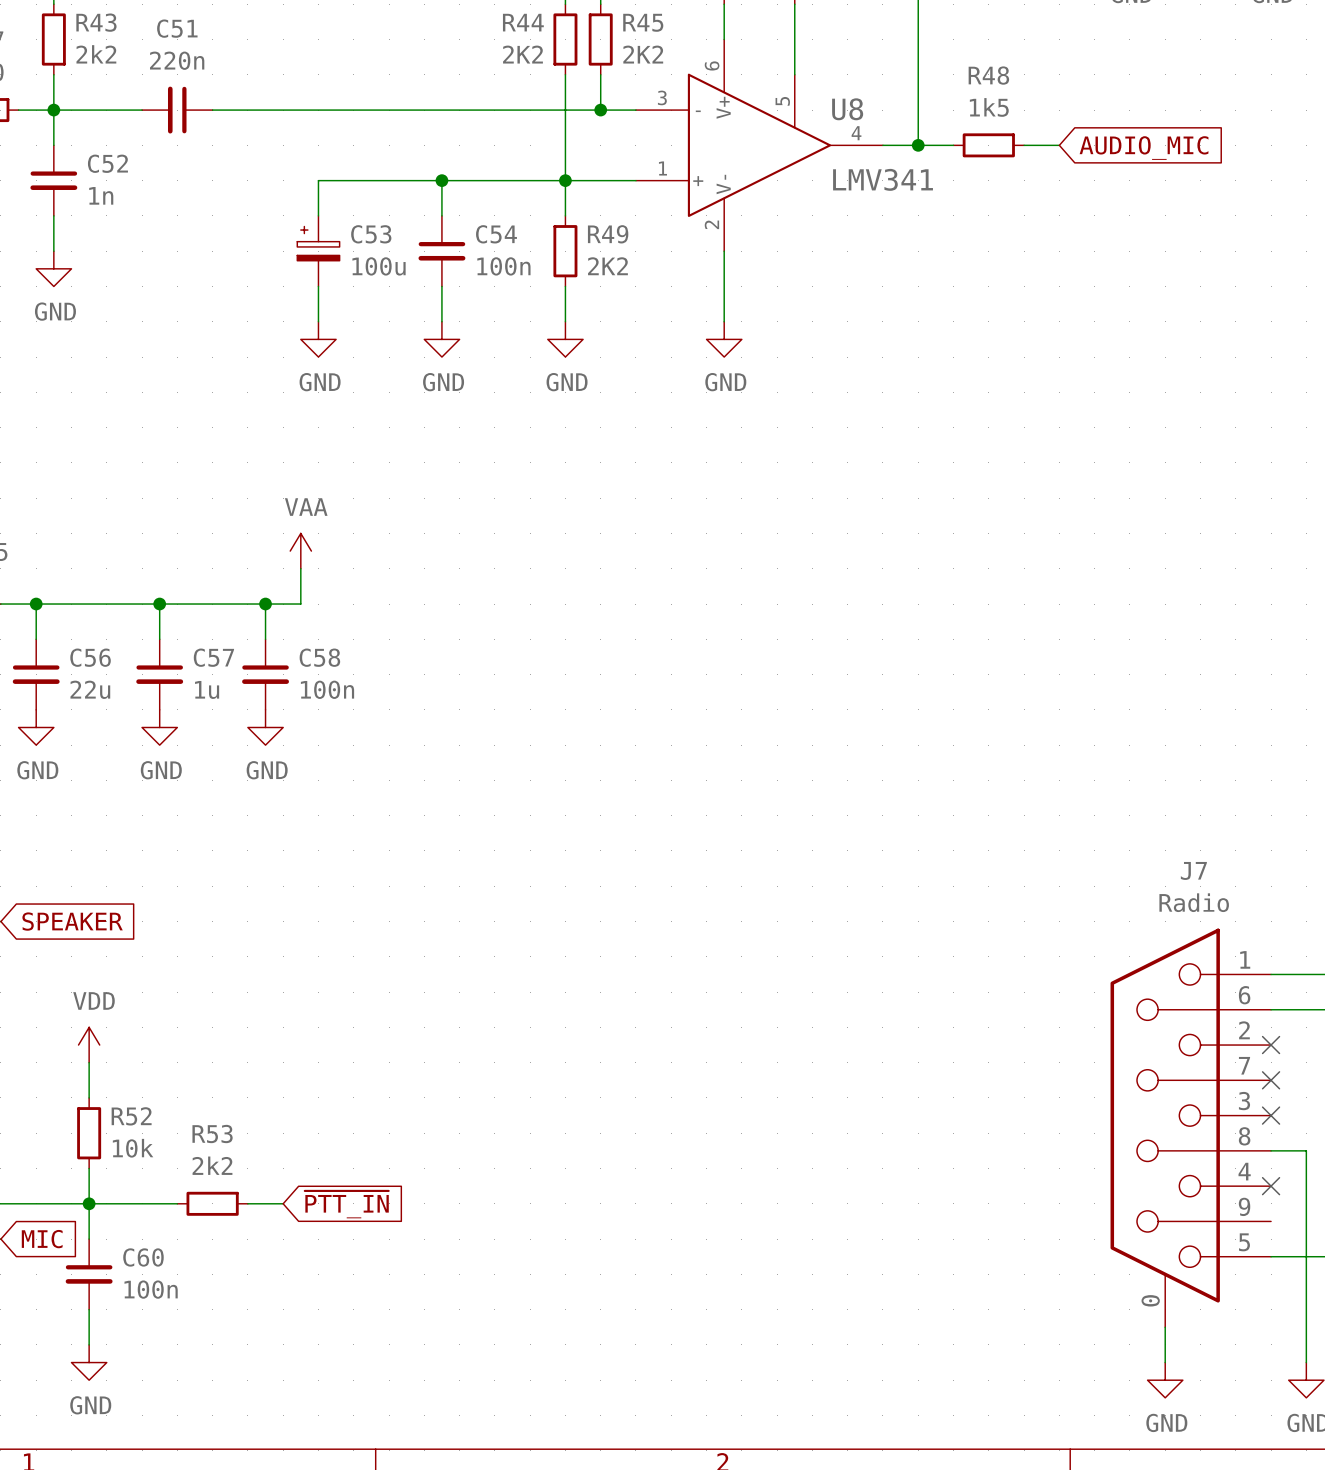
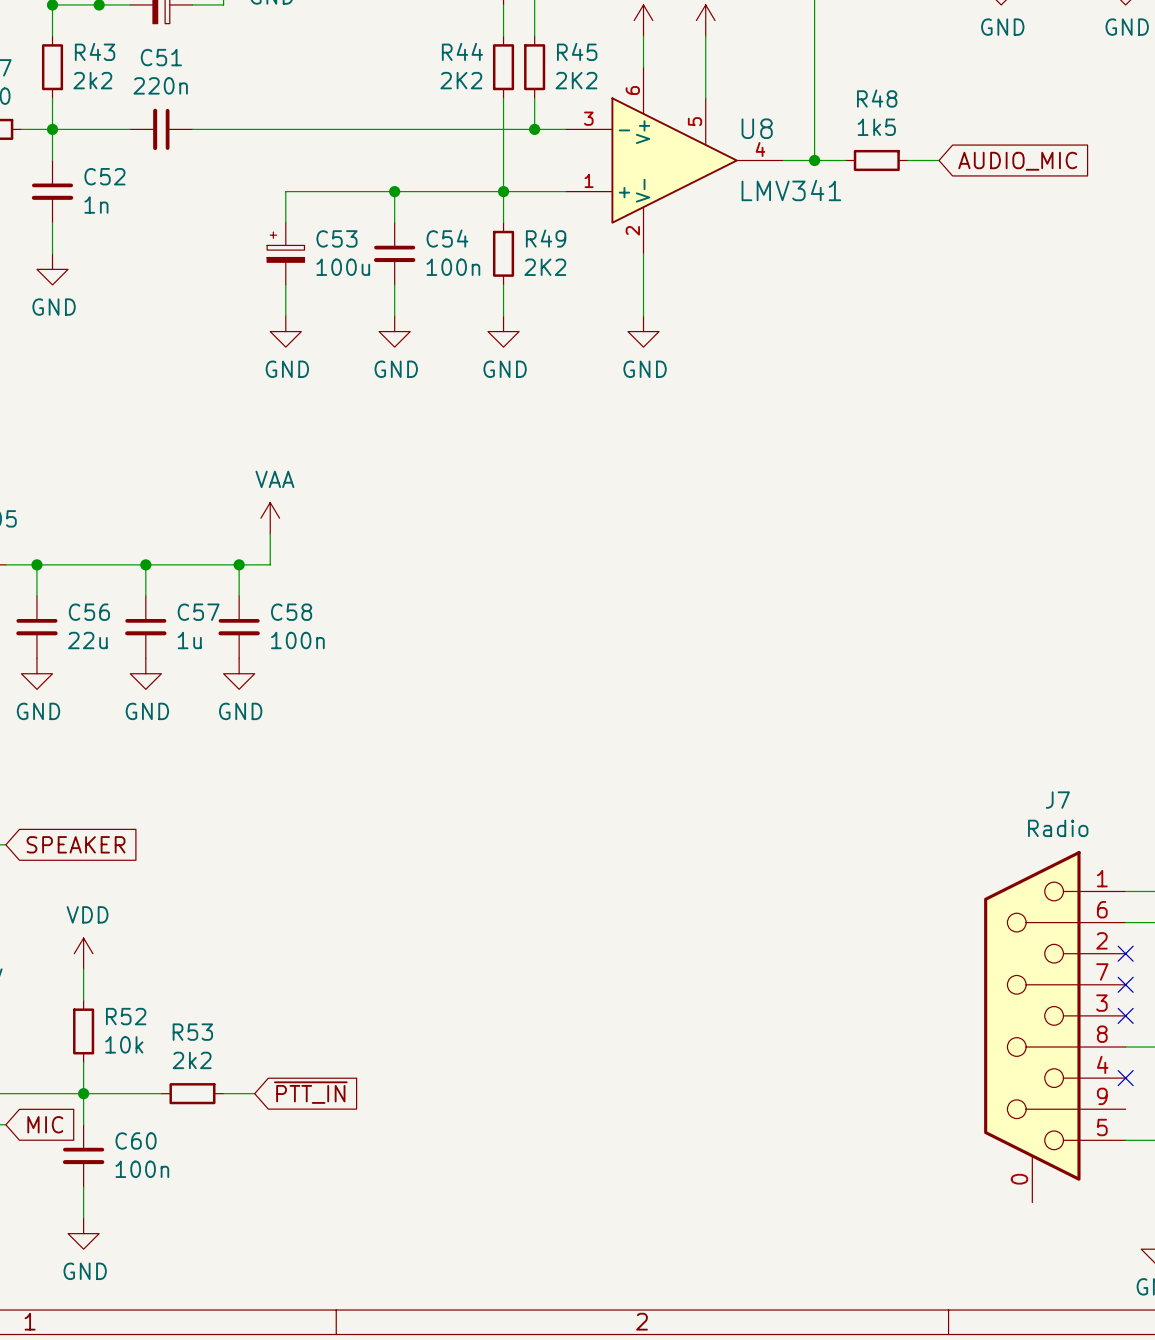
wire: (1165, 1327) (1165, 1362) -> none
power symbol: GND (1165, 1380) -> none

